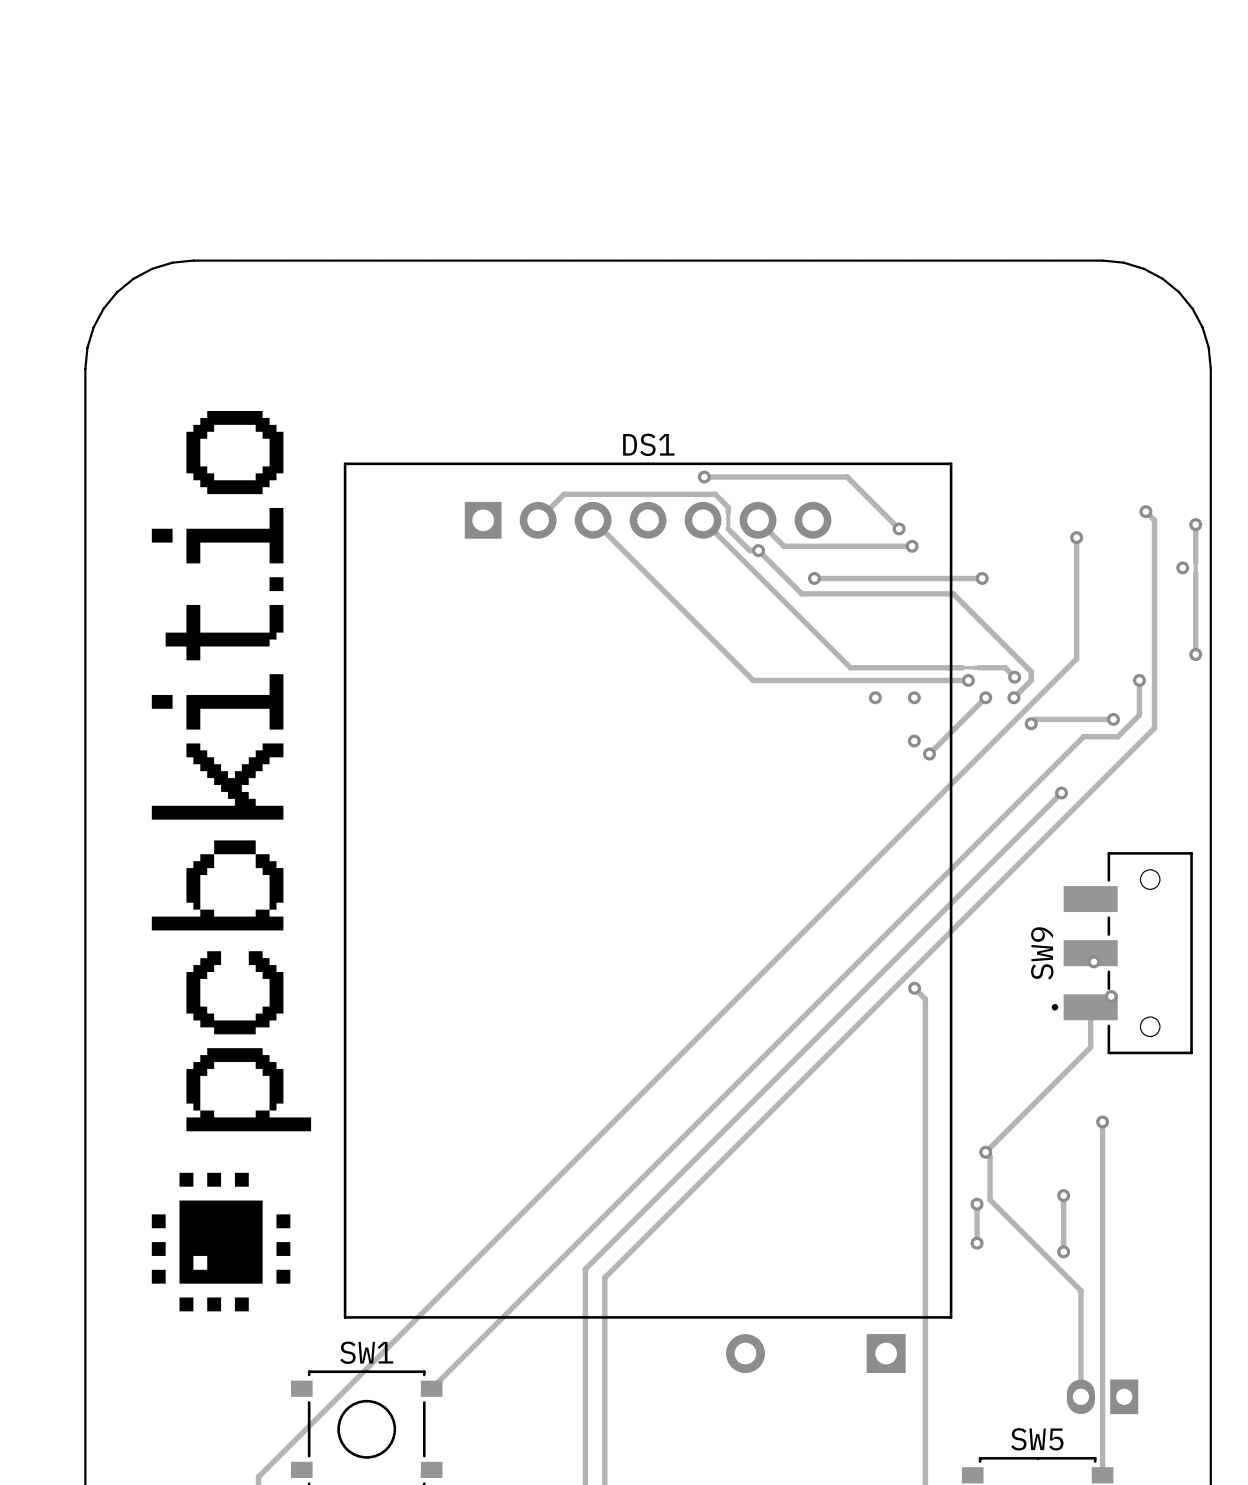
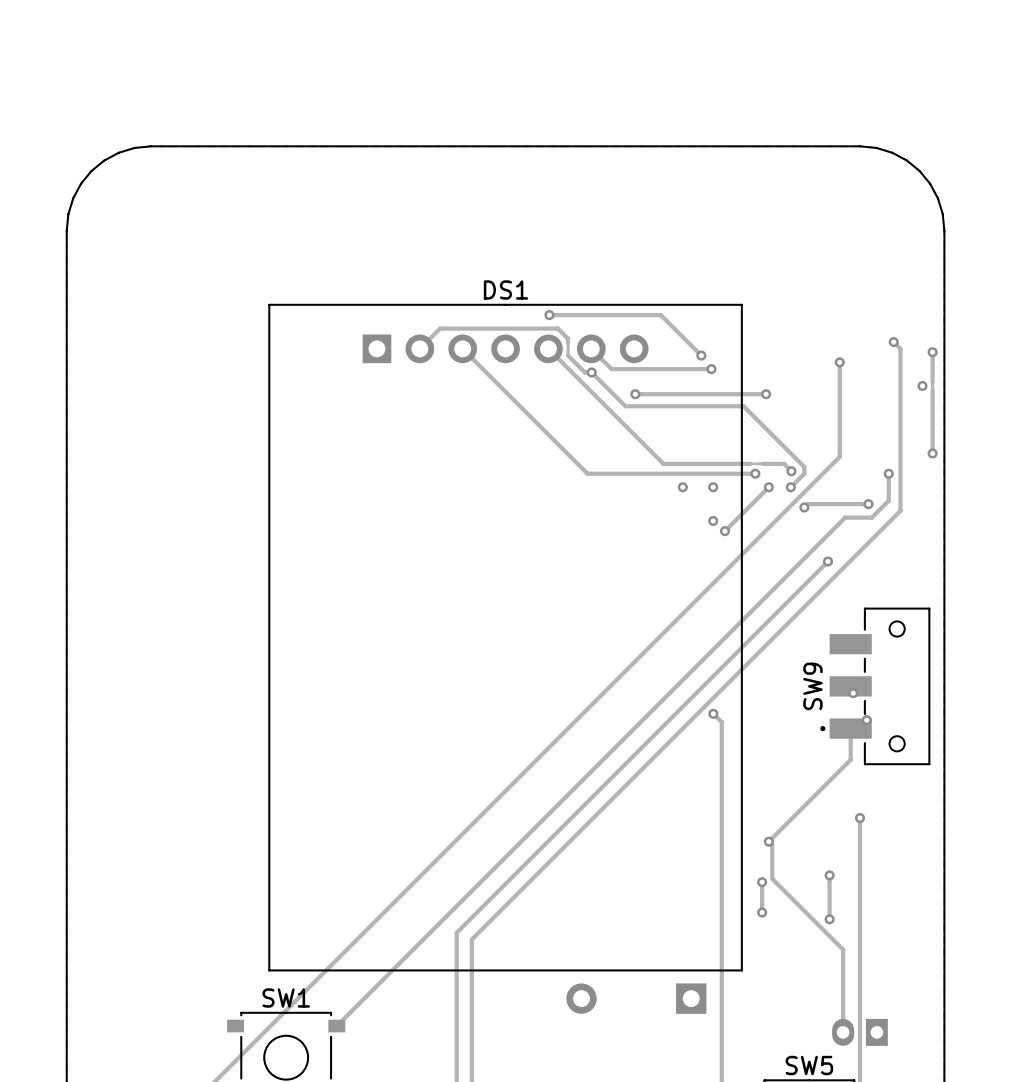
drawing: [151, 411, 312, 1312] -> none

